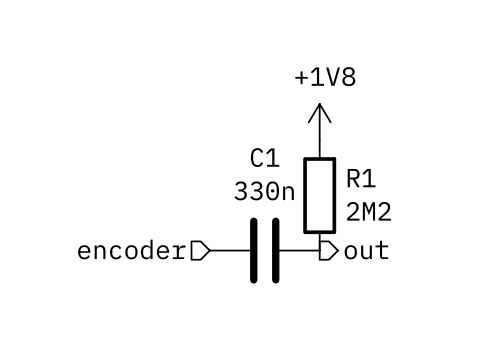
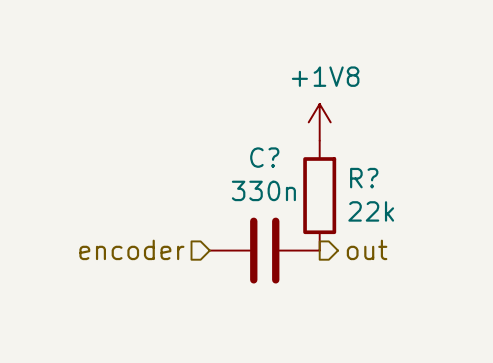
C1 name: C1 (265, 157) -> C? (264, 157)
R1 name: R1 (361, 178) -> R? (364, 178)
R1 value: 2M2 (368, 211) -> 22k (371, 211)

